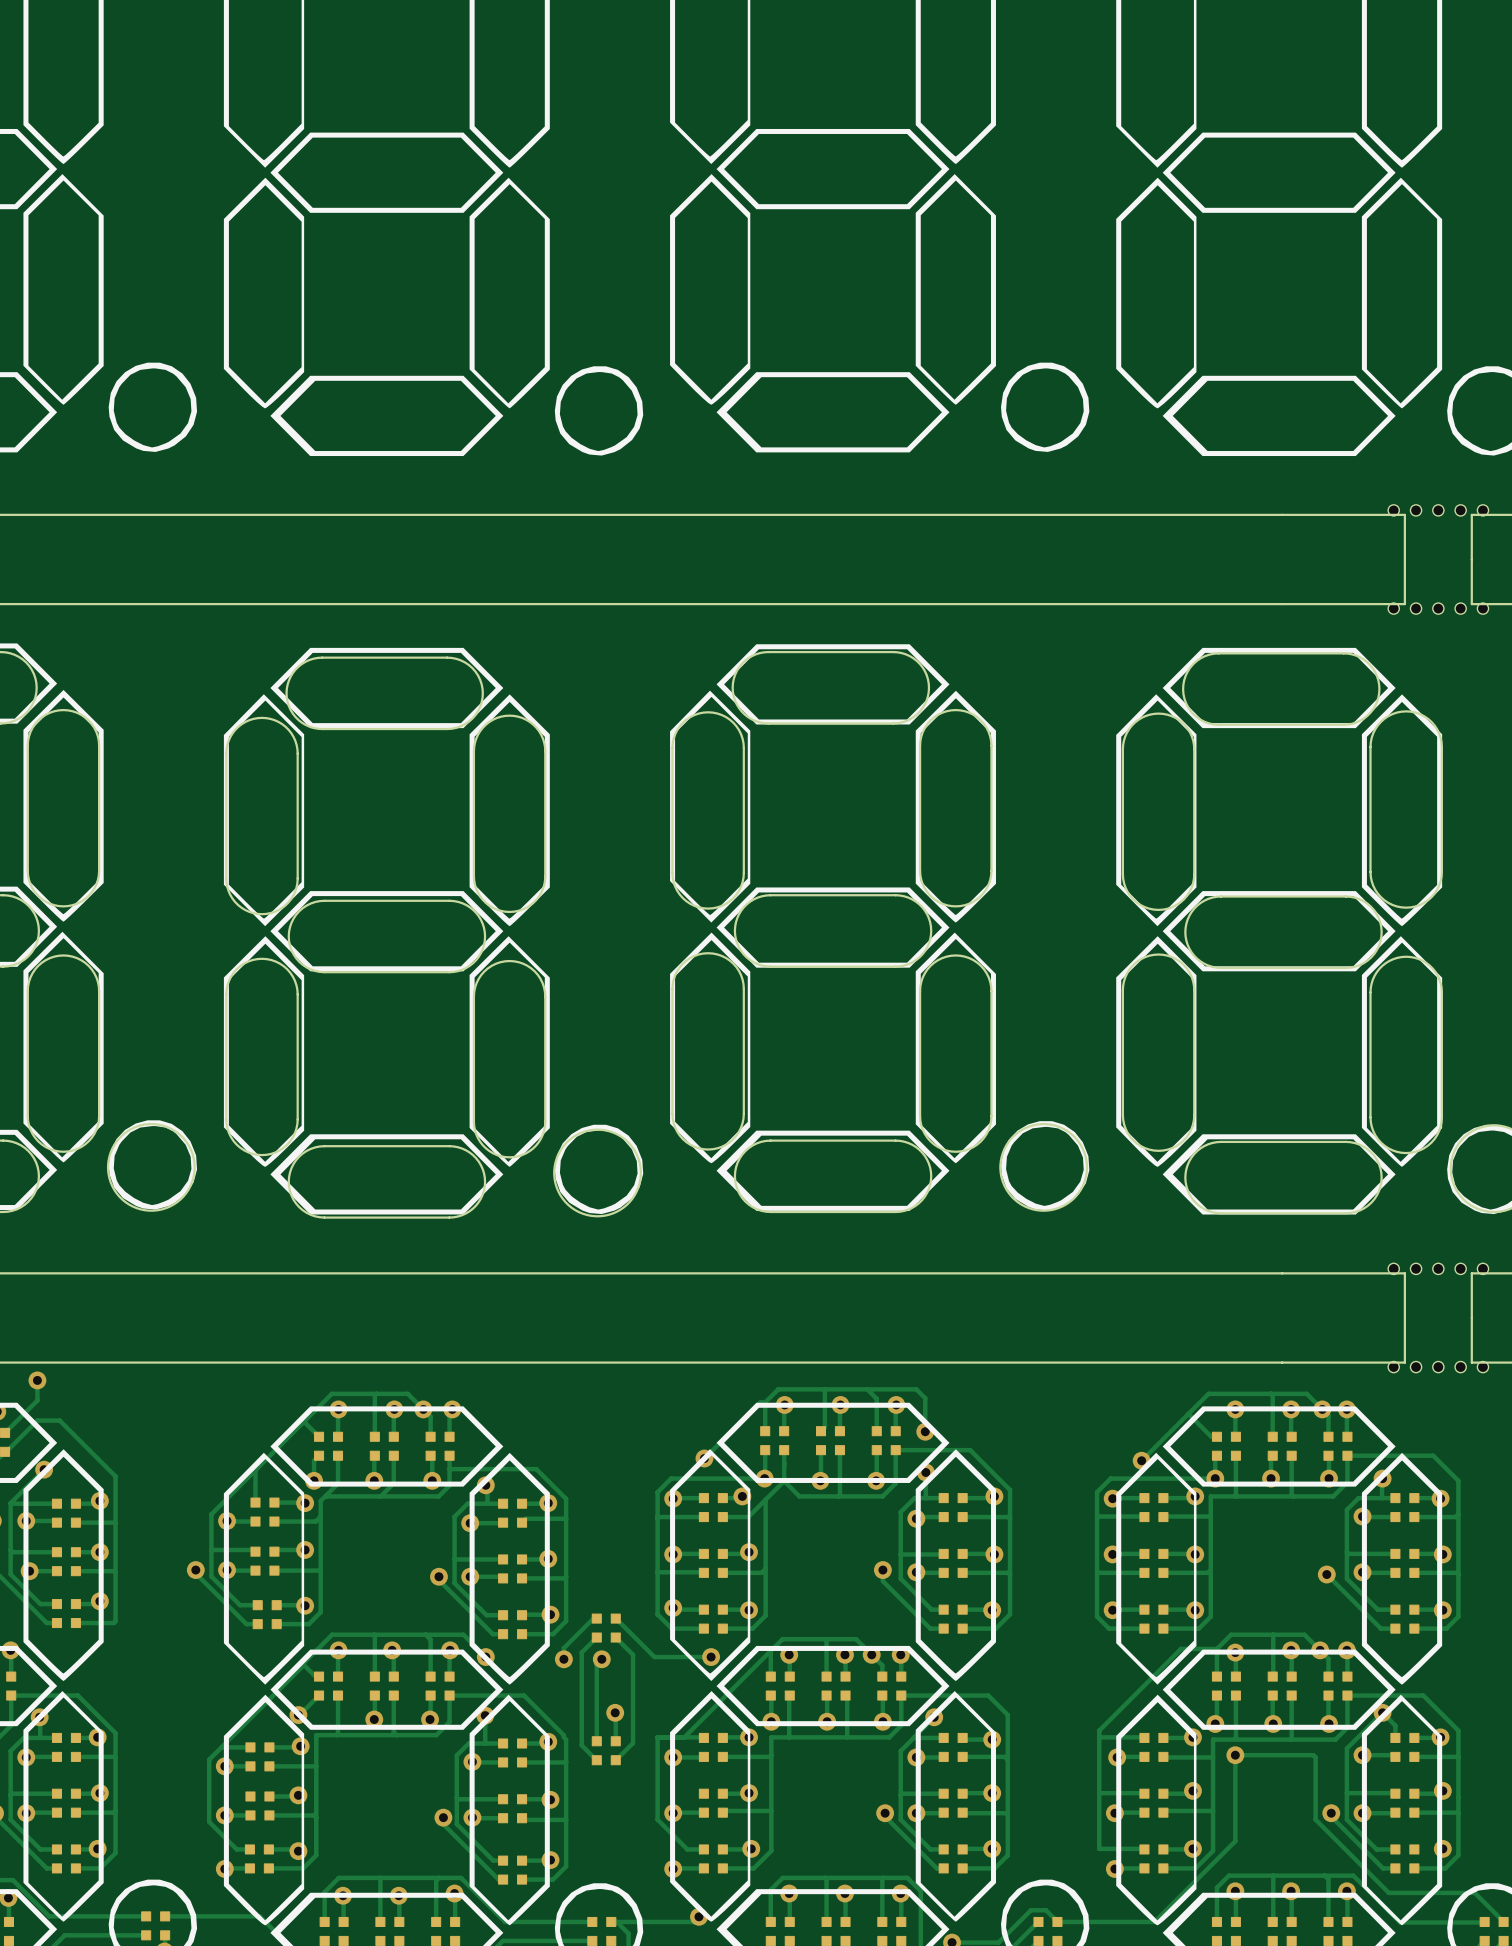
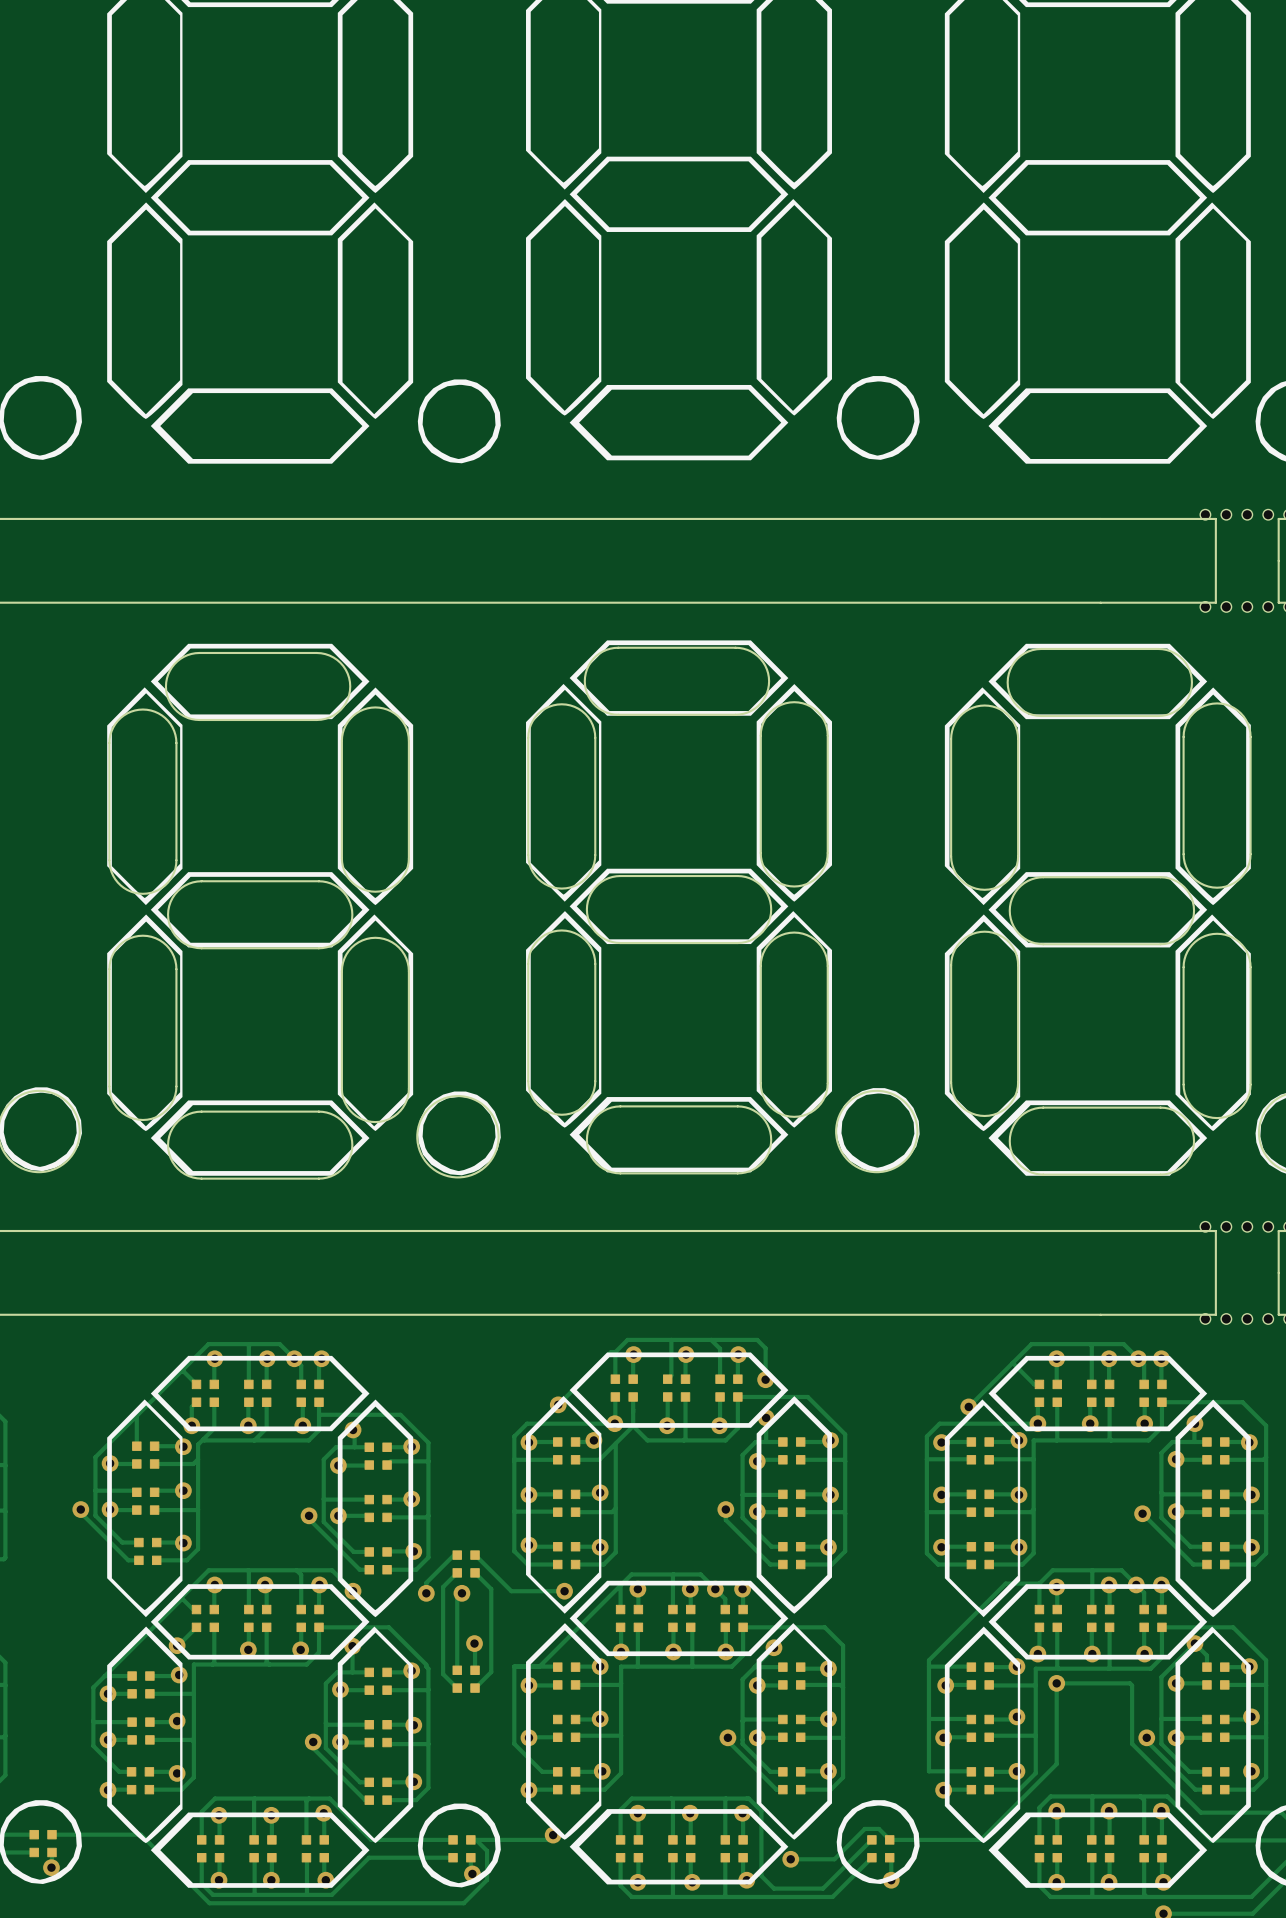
track: none -> (93, 1721) (132, 1722)

